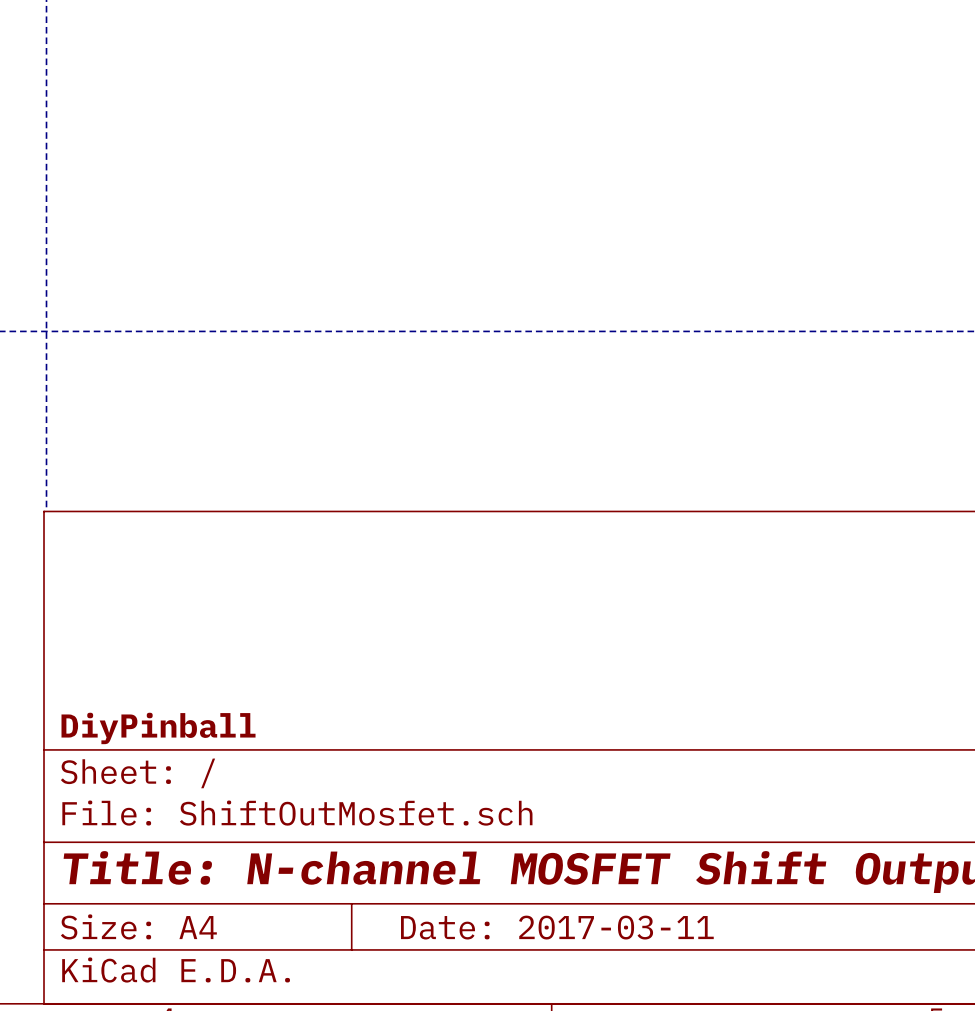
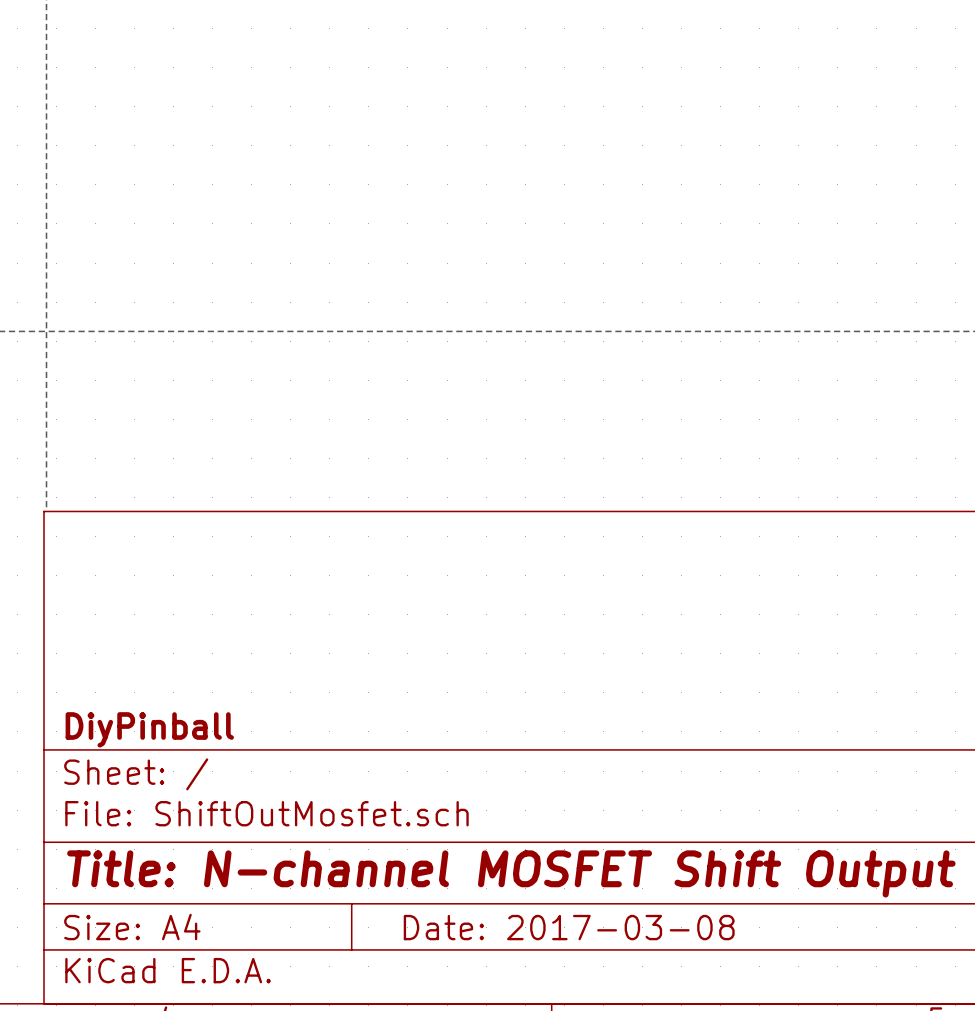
title block: Date: 2017-03-11 (557, 927) -> Date: 2017-03-08 (569, 927)

